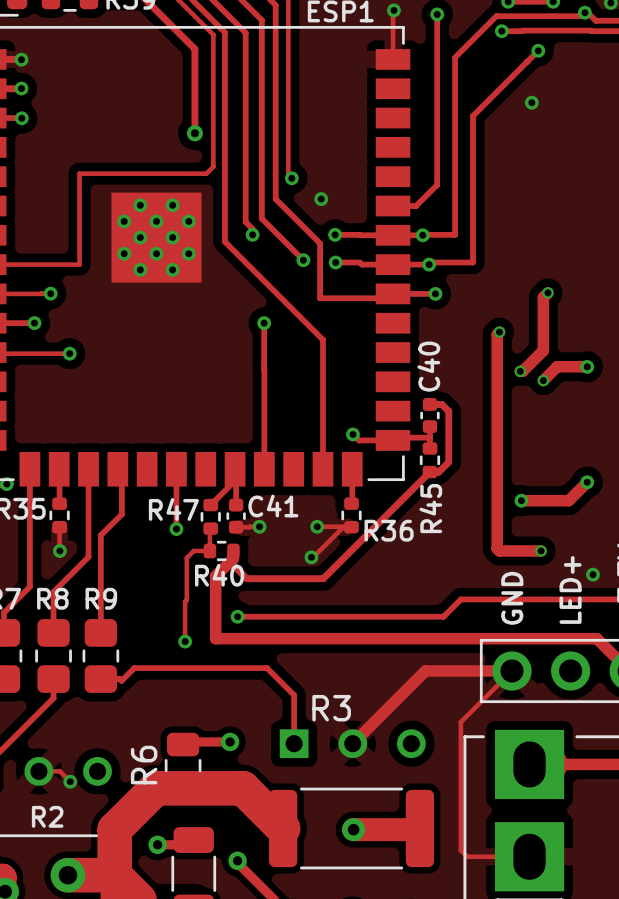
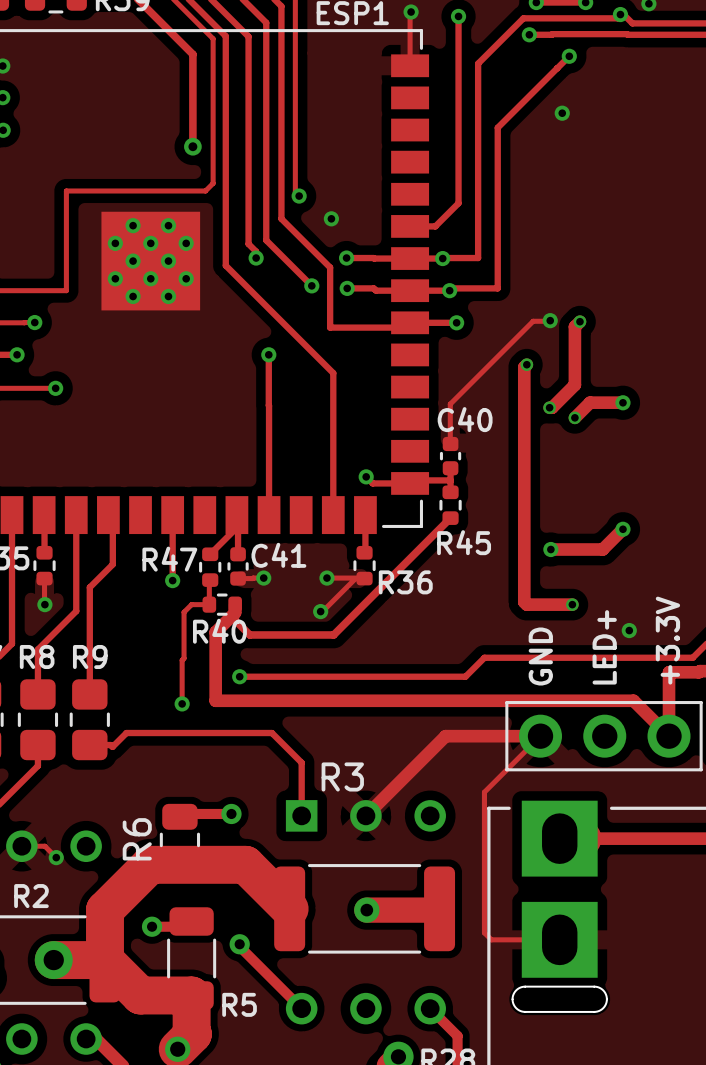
via: none -> (550, 320)
C40 name rotation: 0° (428, 366) -> 90° clockwise (465, 419)
track: (429, 404) (441, 404) (448, 411) (448, 462) (438, 472) (429, 472) -> (450, 443) (450, 404) (533, 321) (550, 320)
R45 name rotation: 0° (430, 508) -> 90° clockwise (464, 542)

